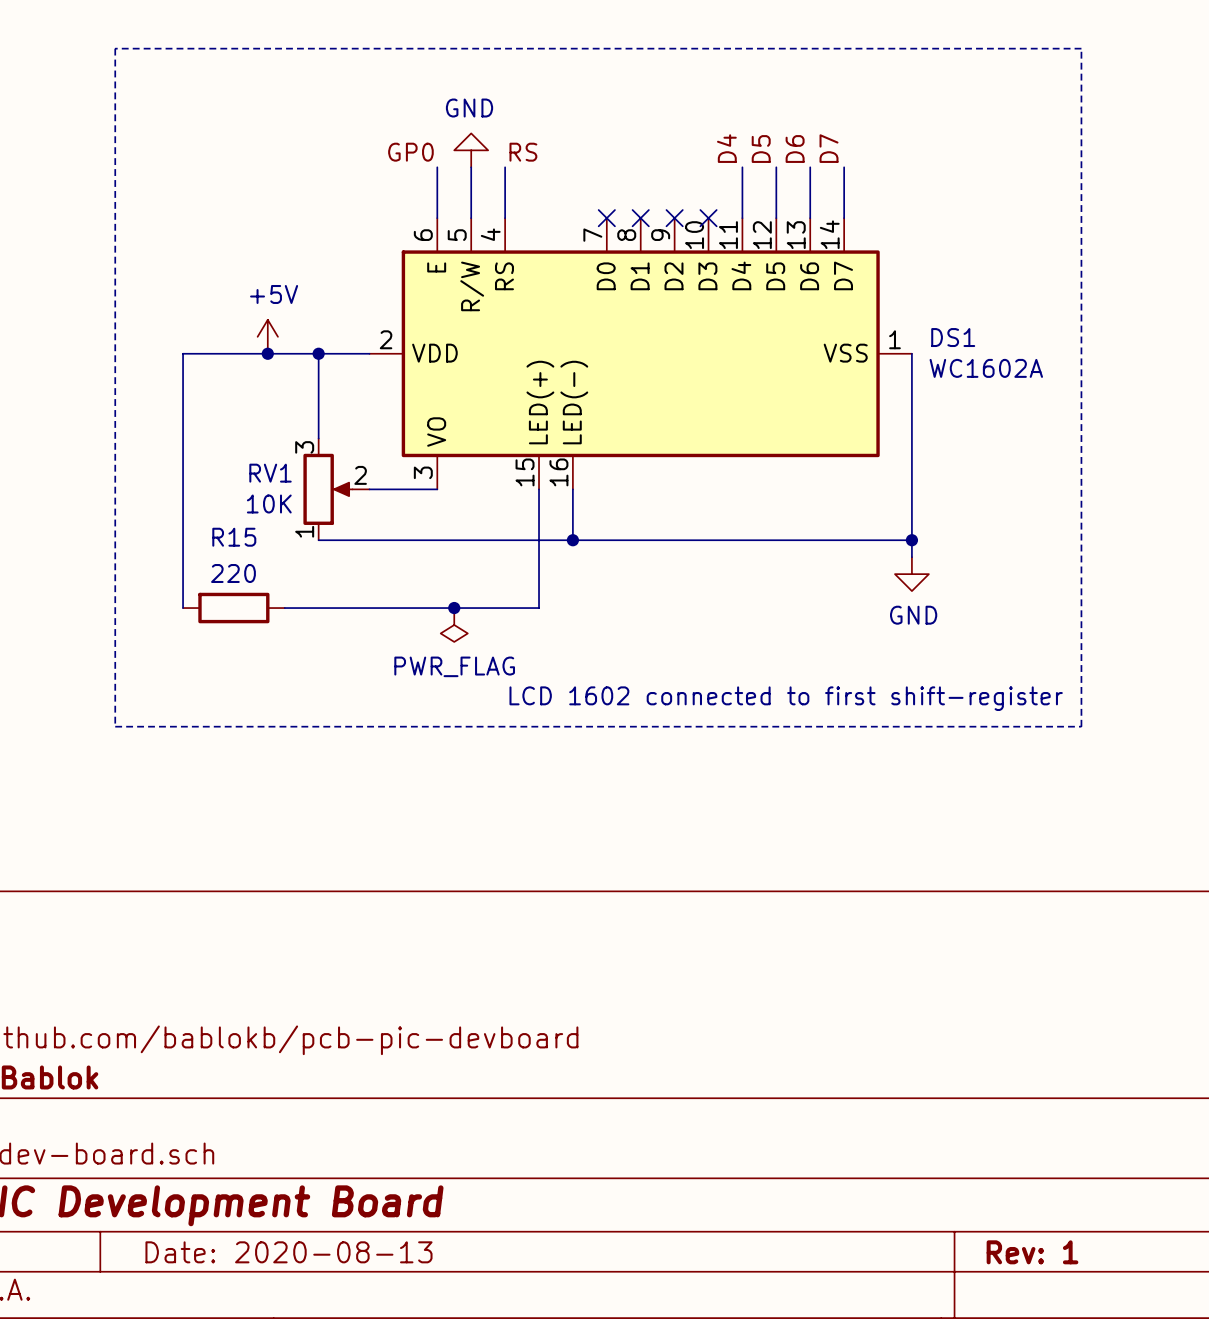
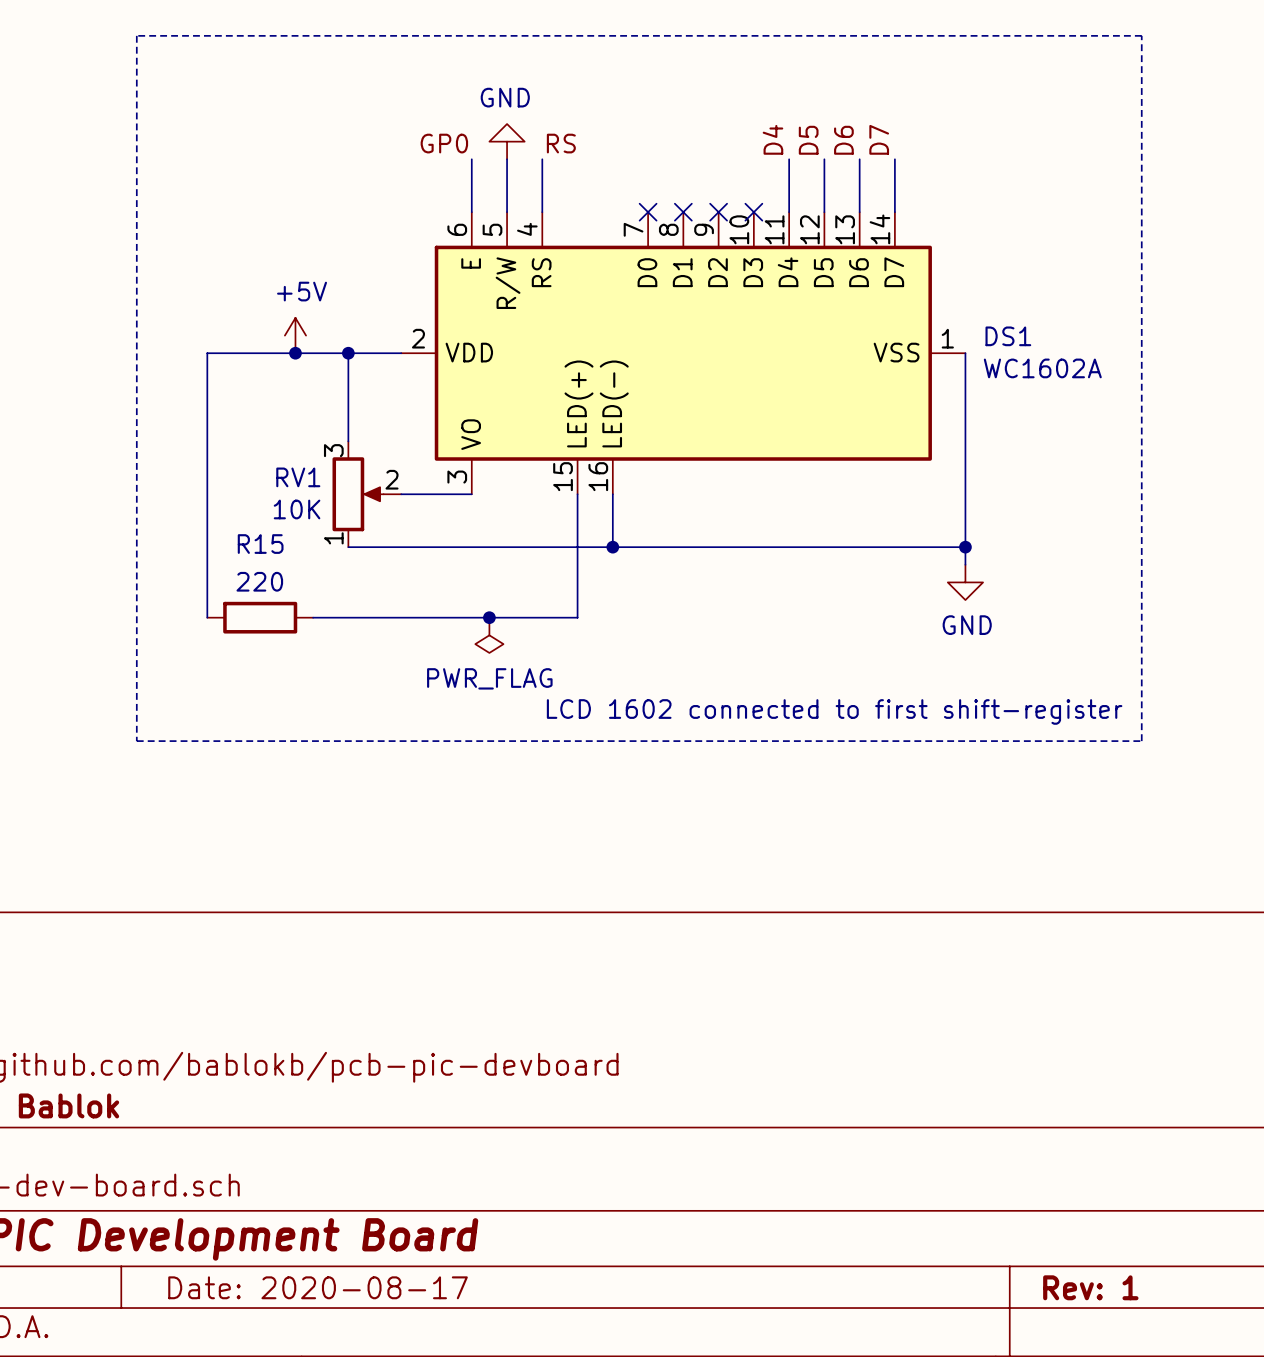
title block: Date: 2020-08-13 (288, 1252) -> Date: 2020-08-17 (318, 1287)

